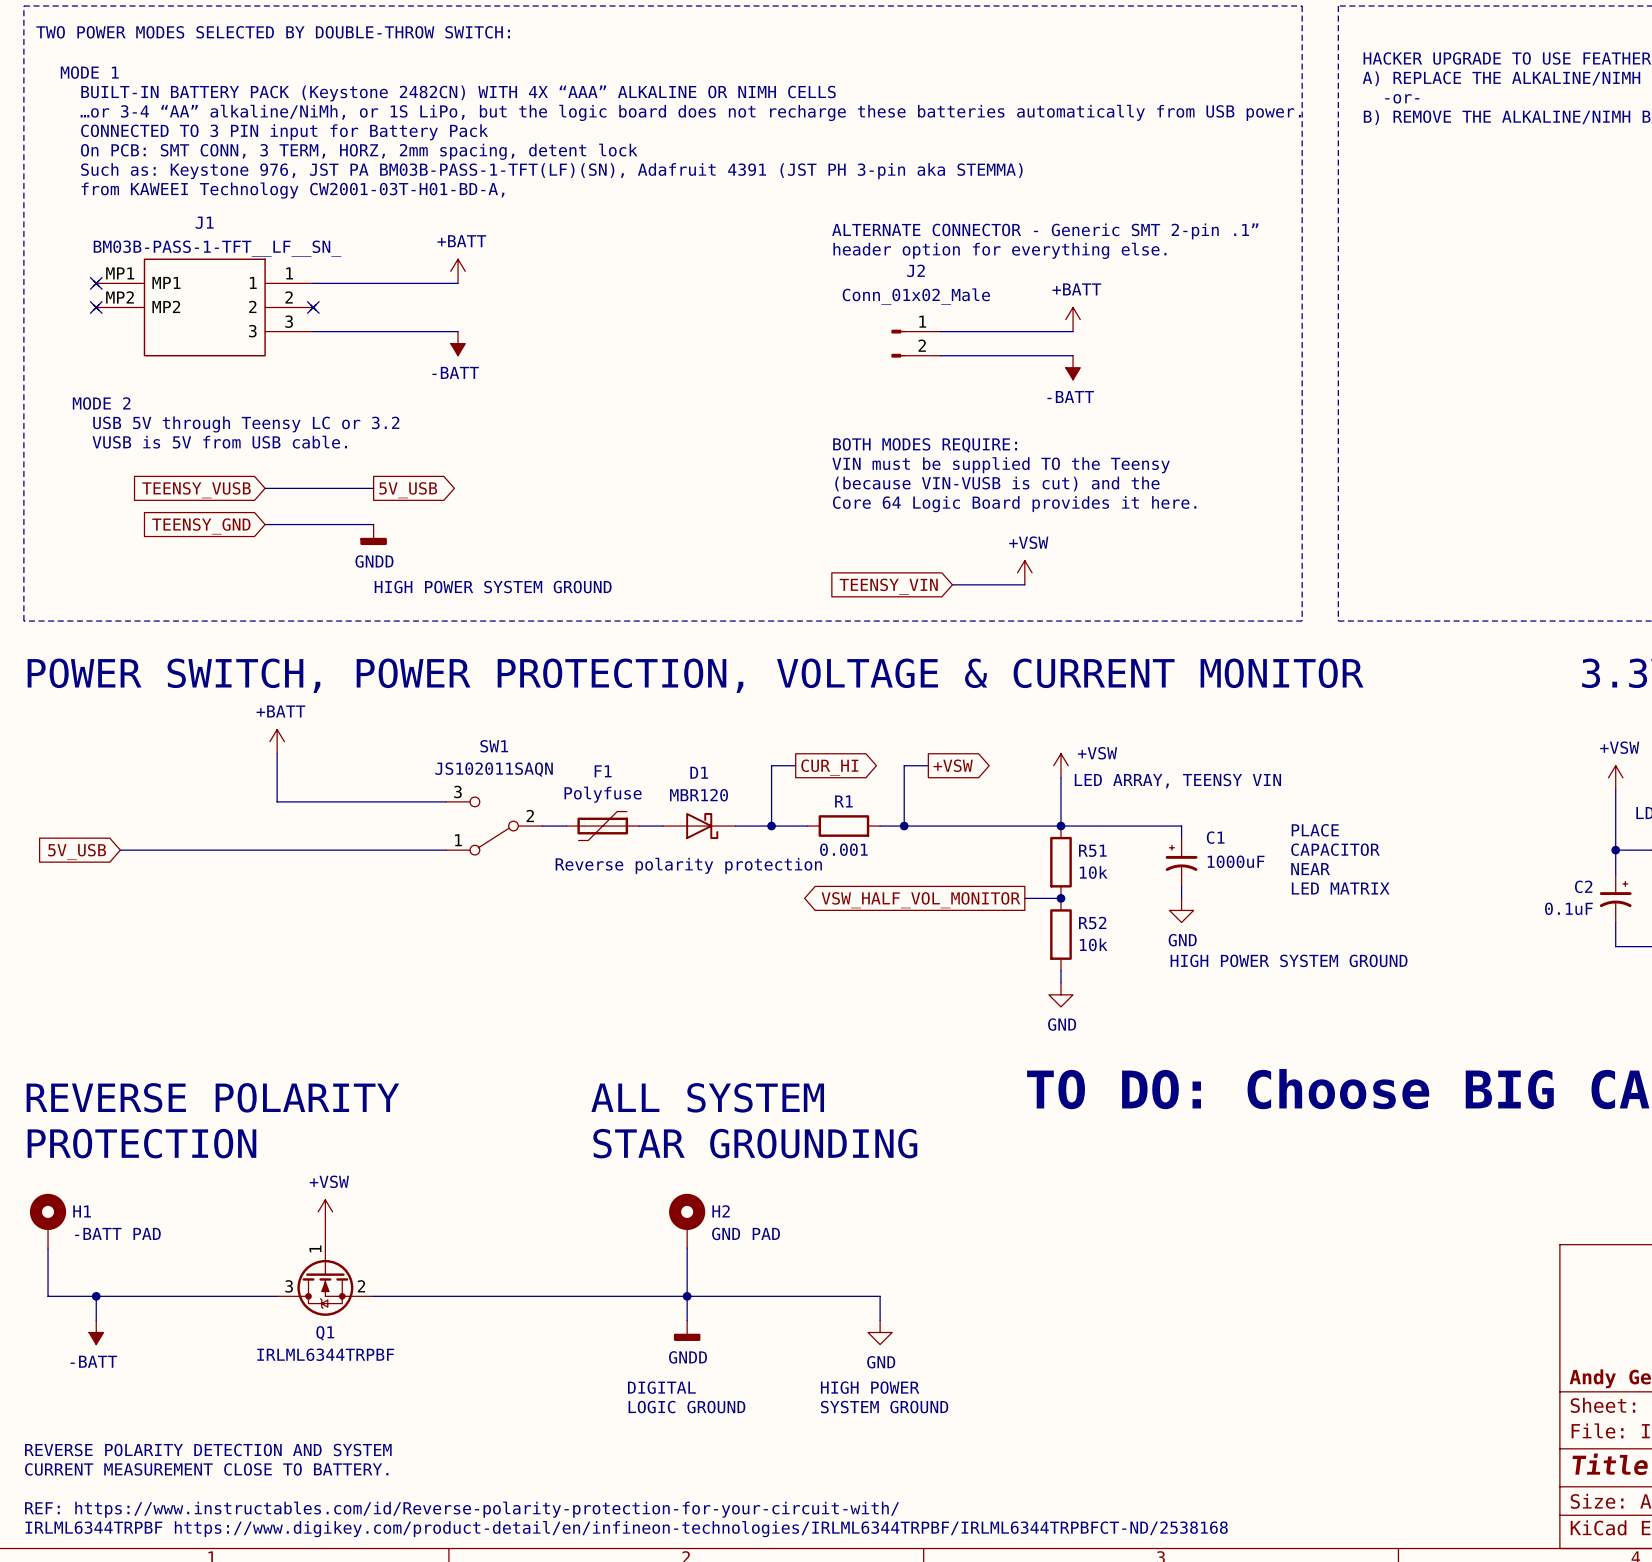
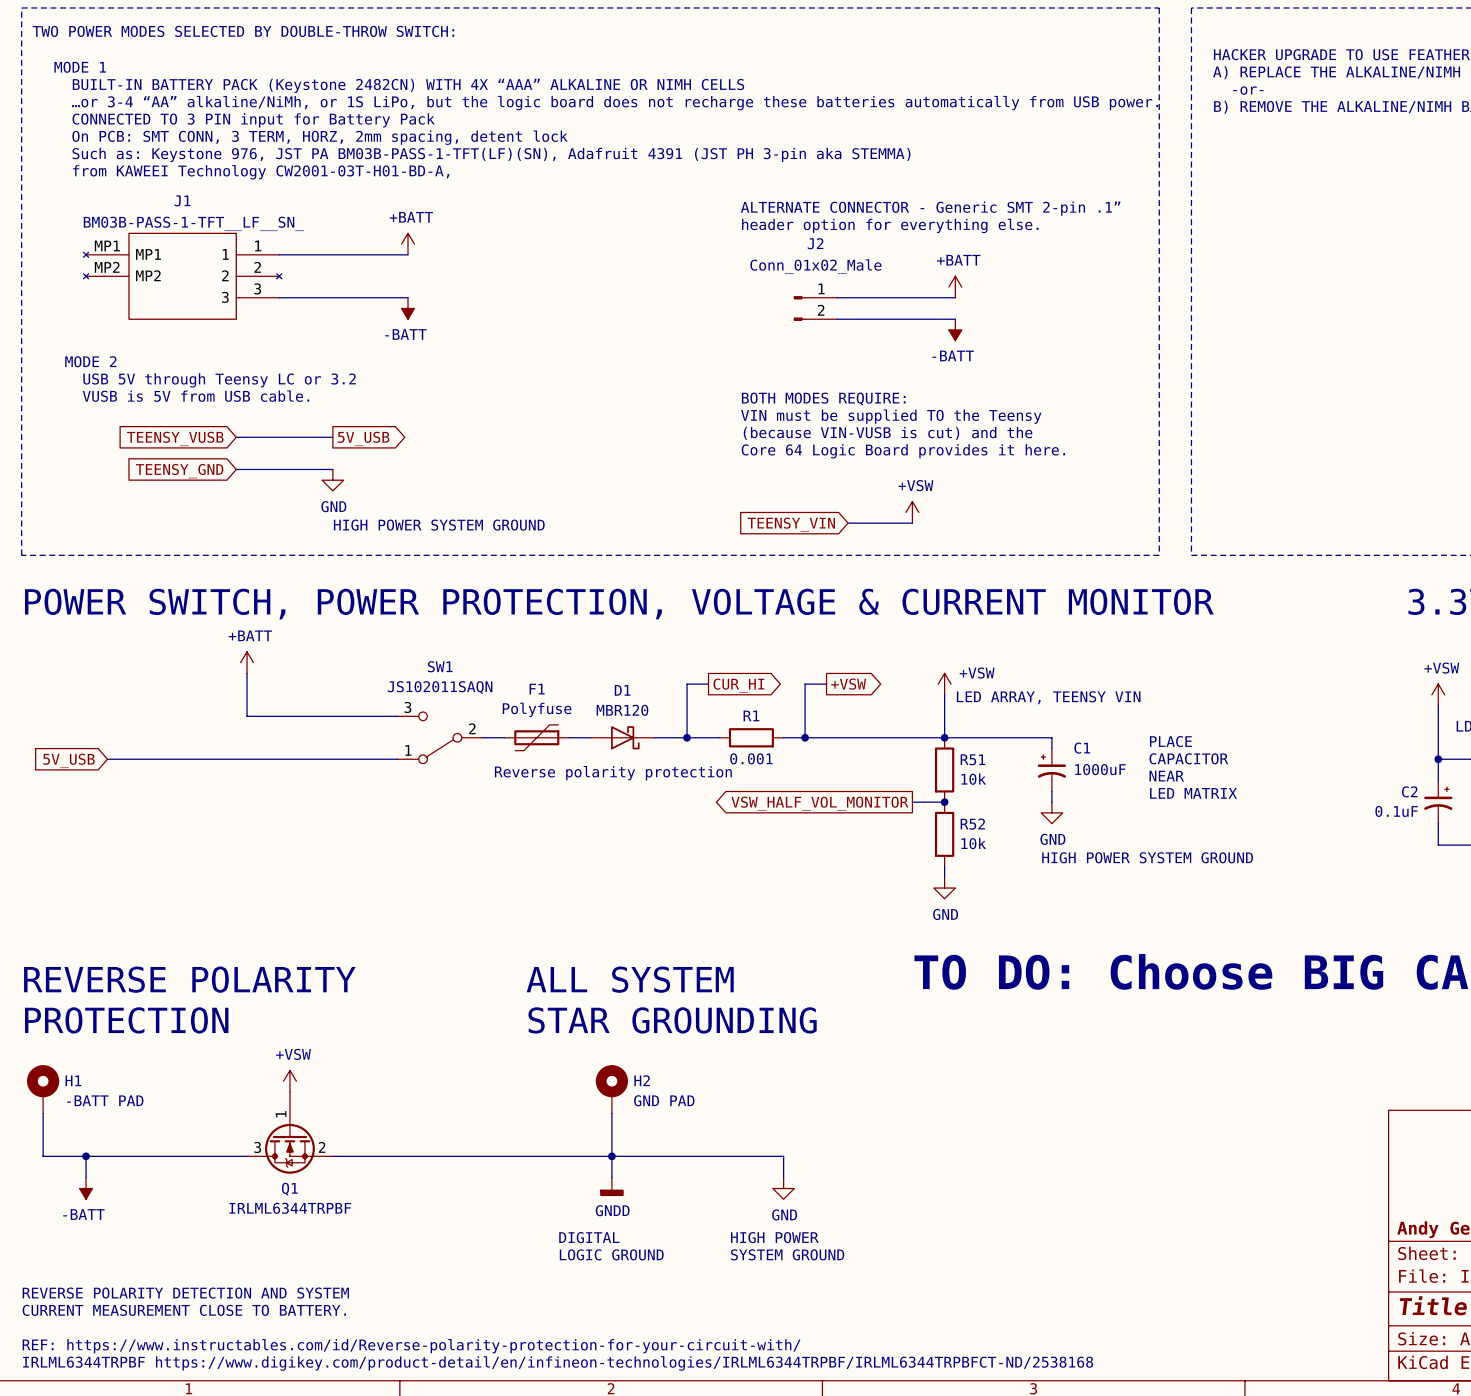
no-connect mark: (96, 283) -> none
no-connect mark: (96, 307) -> none
no-connect mark: (313, 307) -> none
power symbol: GNDD (373, 534) -> GND (332, 480)

